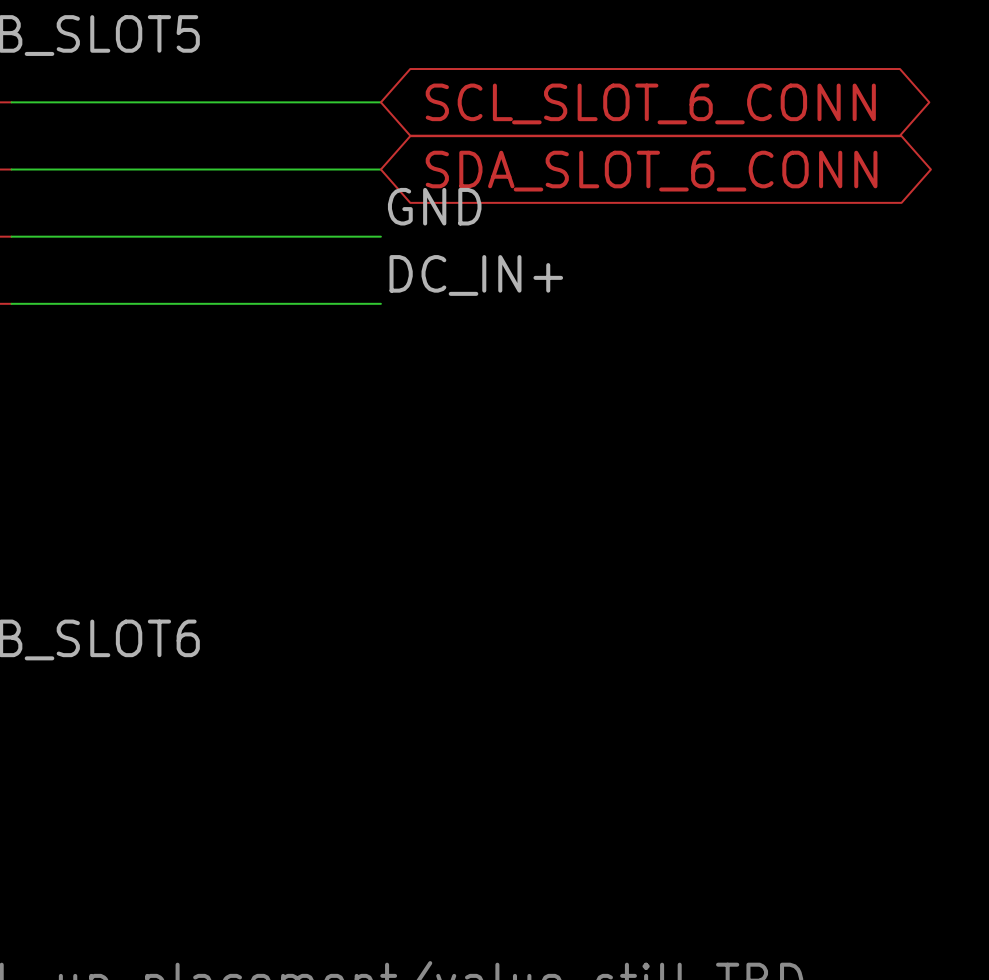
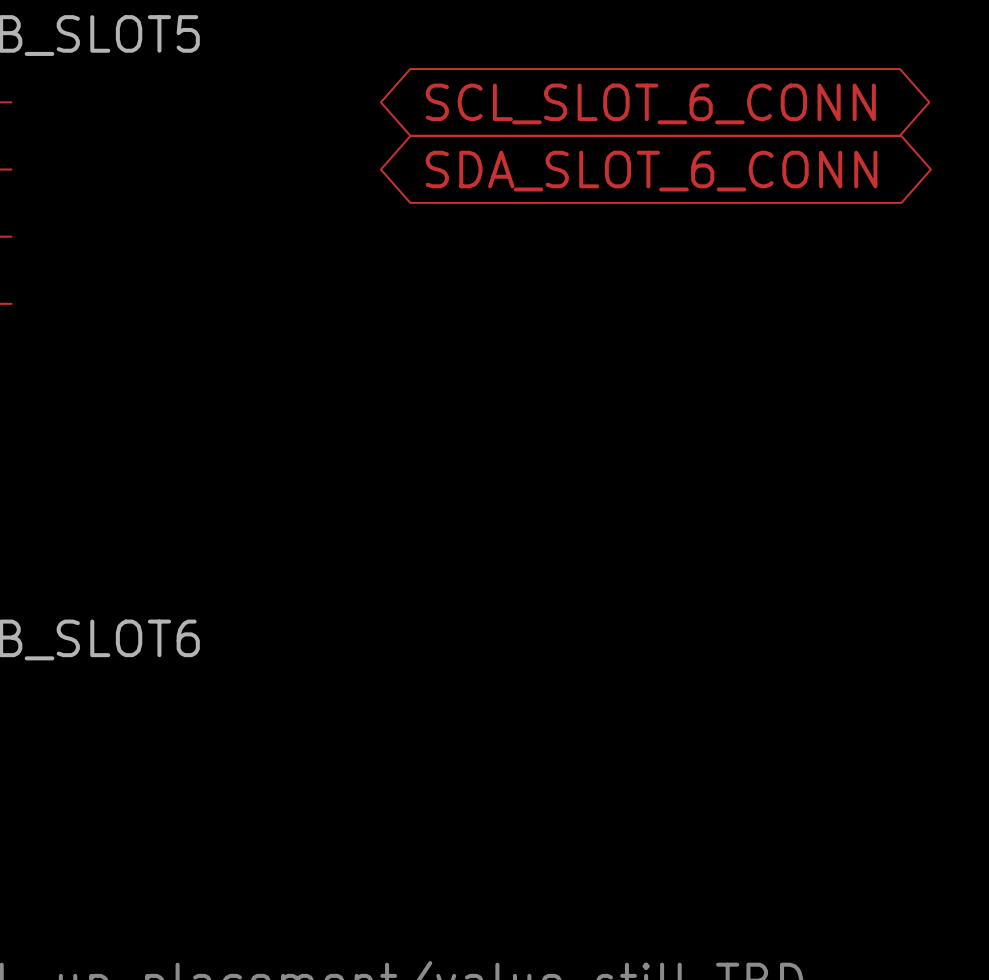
wire: (11, 102) (380, 102) -> none
wire: (11, 169) (380, 169) -> none
label: GND (434, 206) -> none
wire: (11, 236) (380, 236) -> none
label: DC_IN+ (476, 275) -> none
wire: (11, 303) (380, 303) -> none

